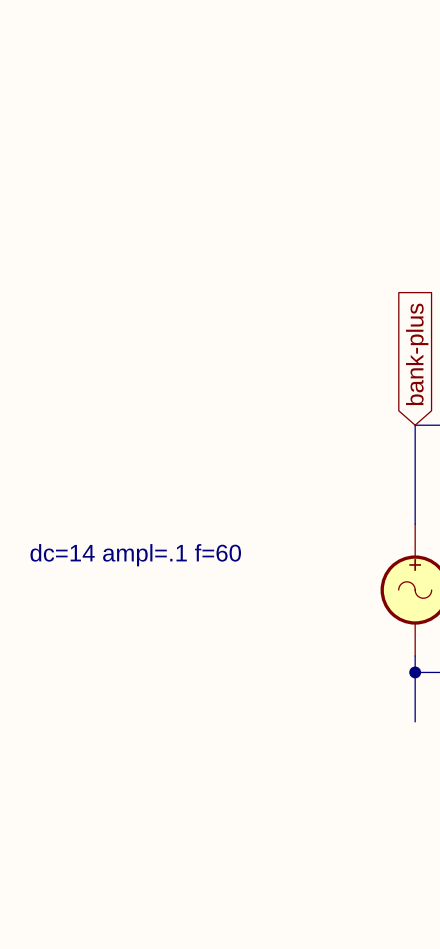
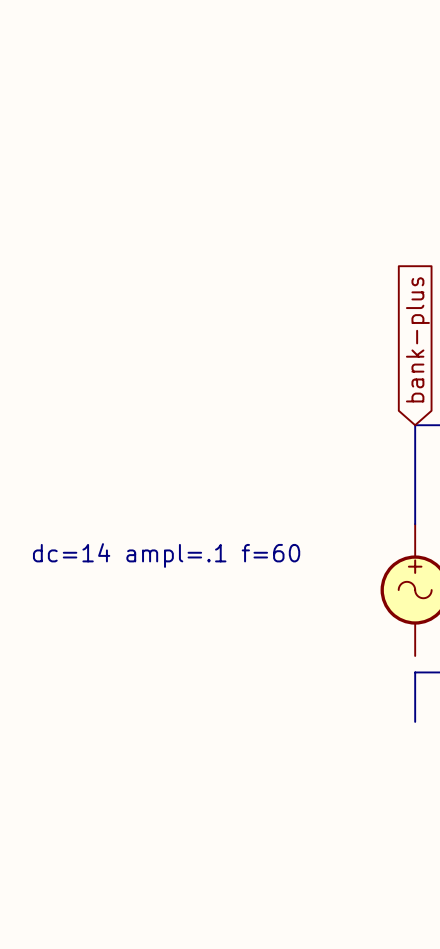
wire: (415, 655) (415, 672) -> none
junction: (415, 672) -> none

